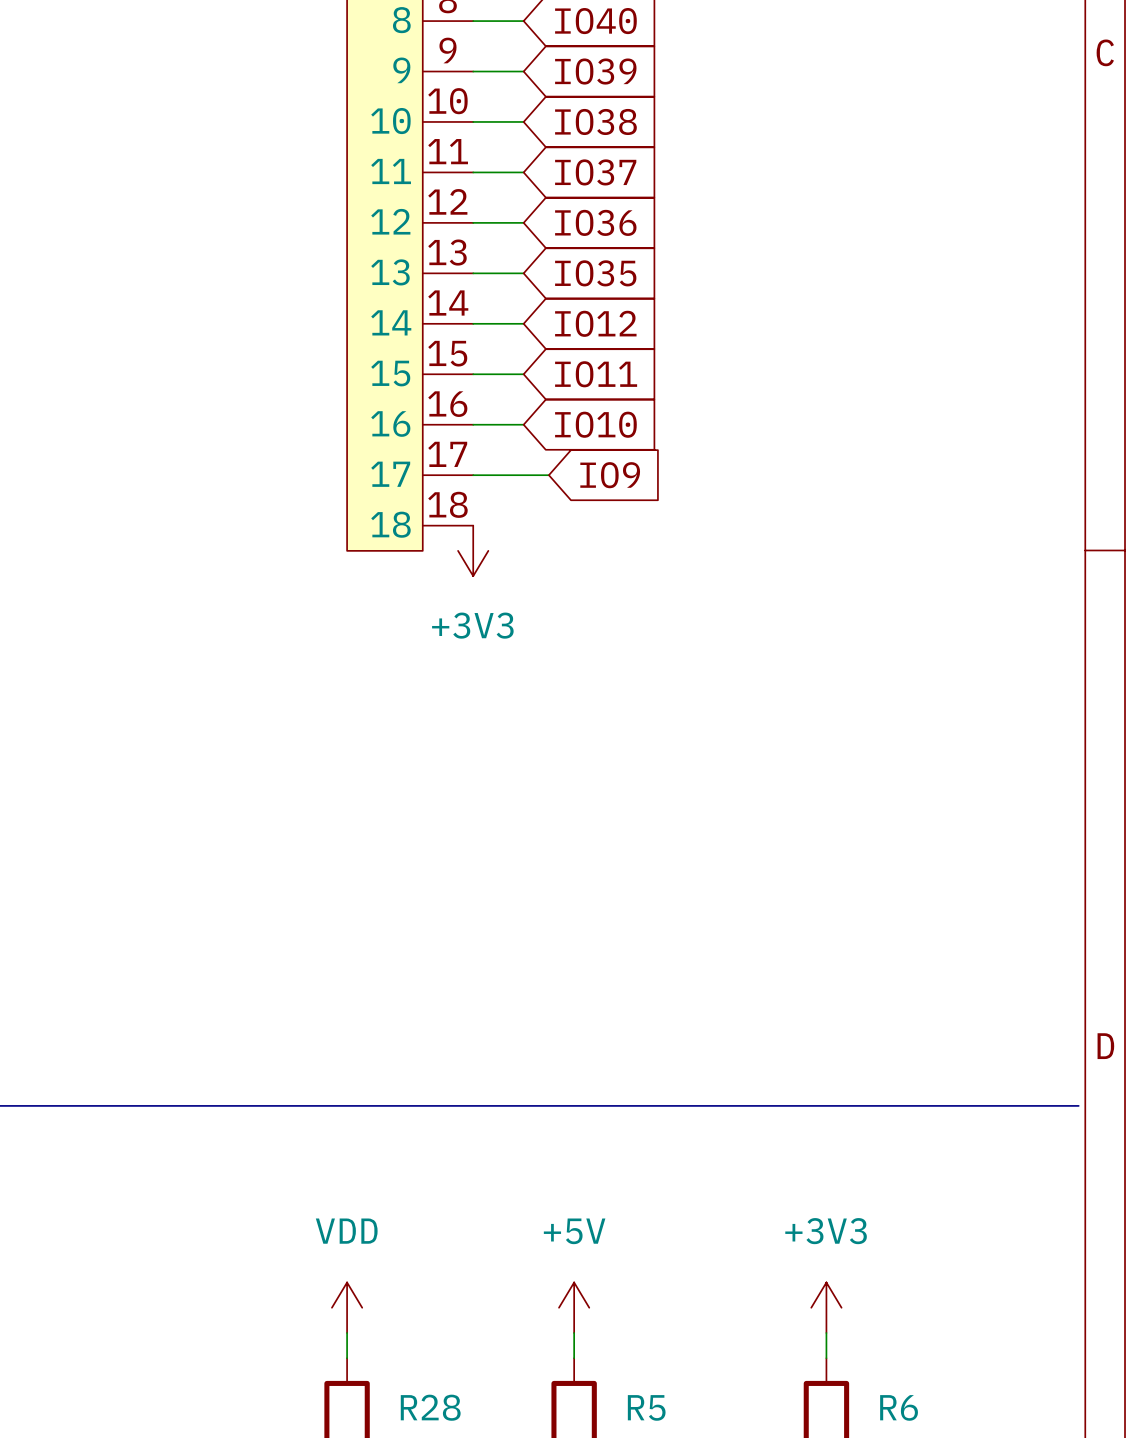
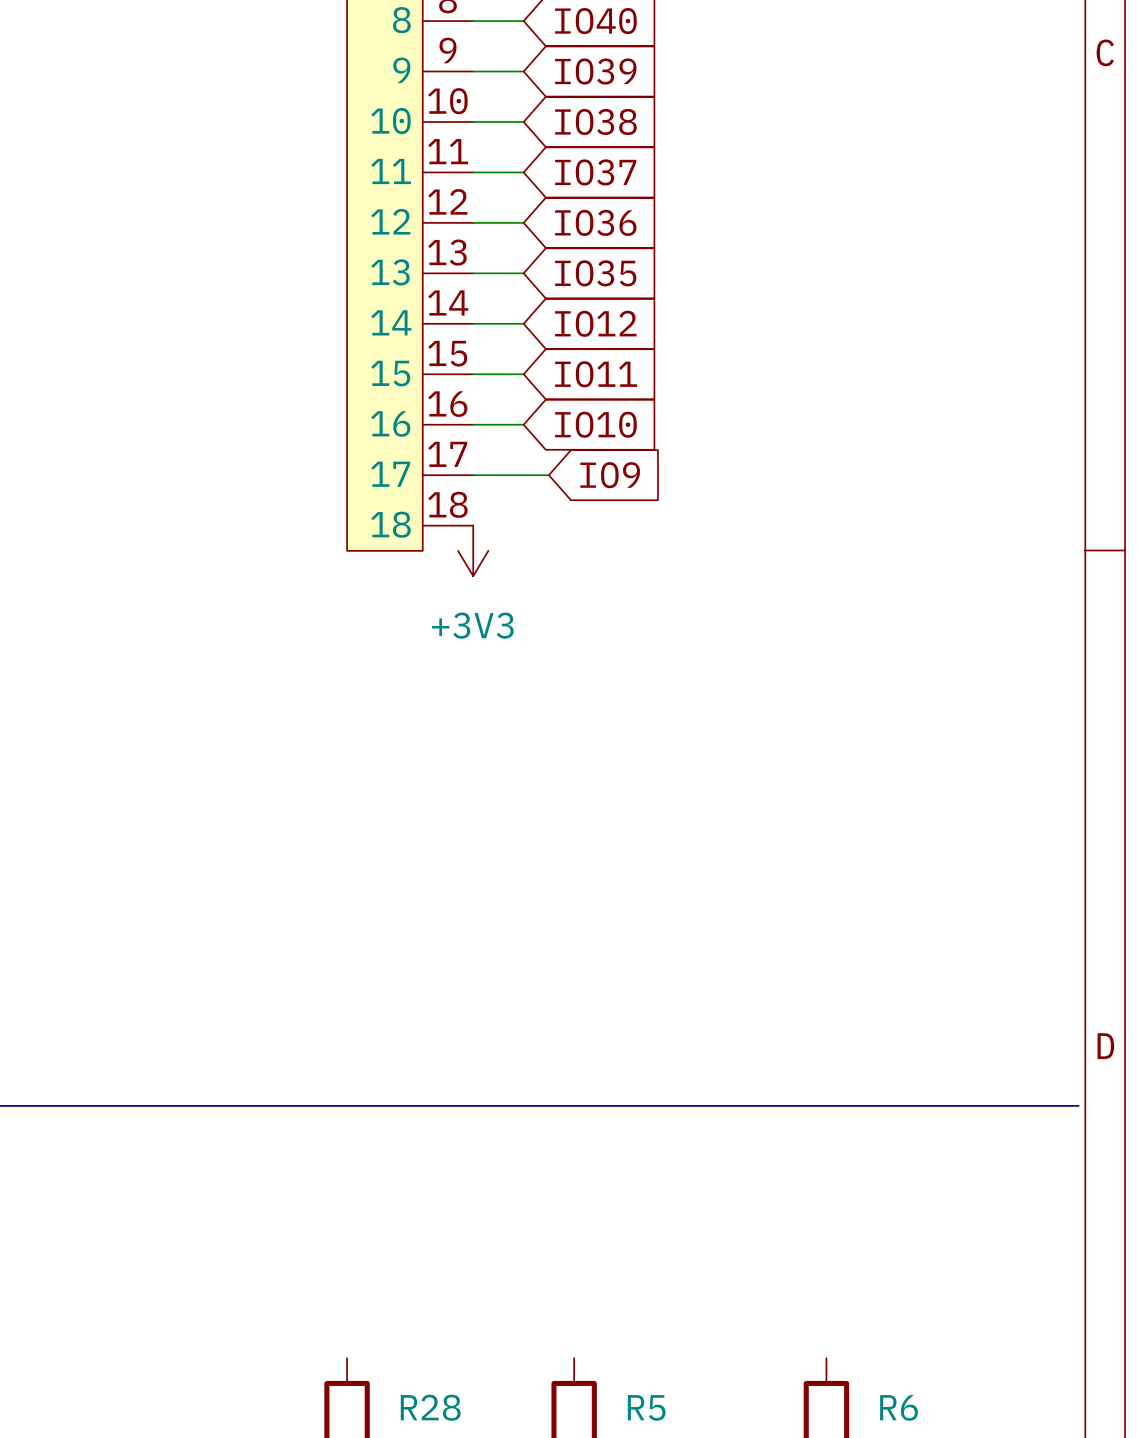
power symbol: VDD (347, 1307) -> none
power symbol: +5V (574, 1307) -> none
power symbol: +3V3 (826, 1307) -> none
wire: (347, 1332) (347, 1358) -> none
wire: (574, 1332) (574, 1358) -> none
wire: (826, 1332) (826, 1358) -> none

